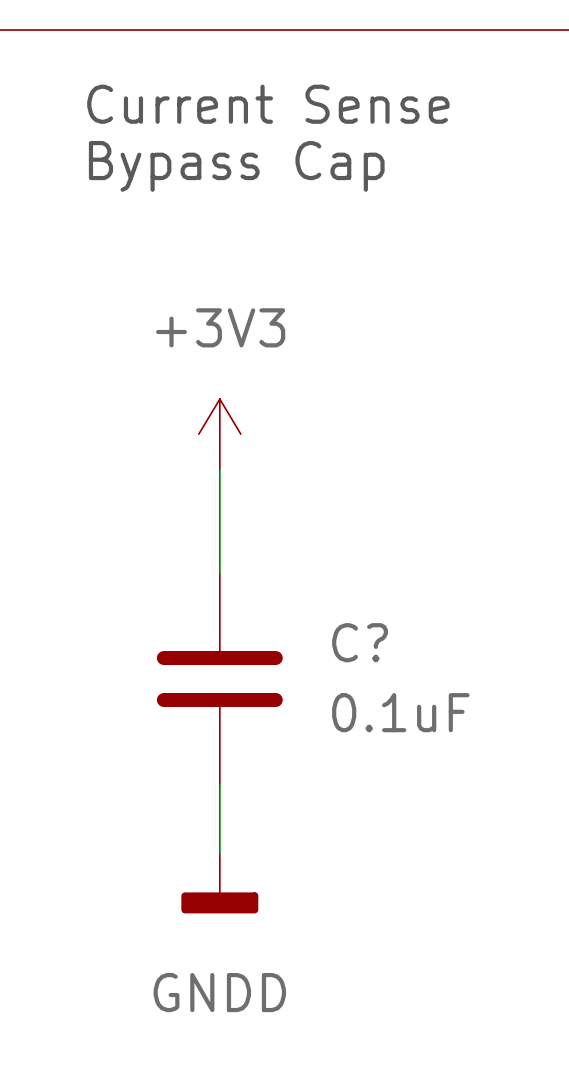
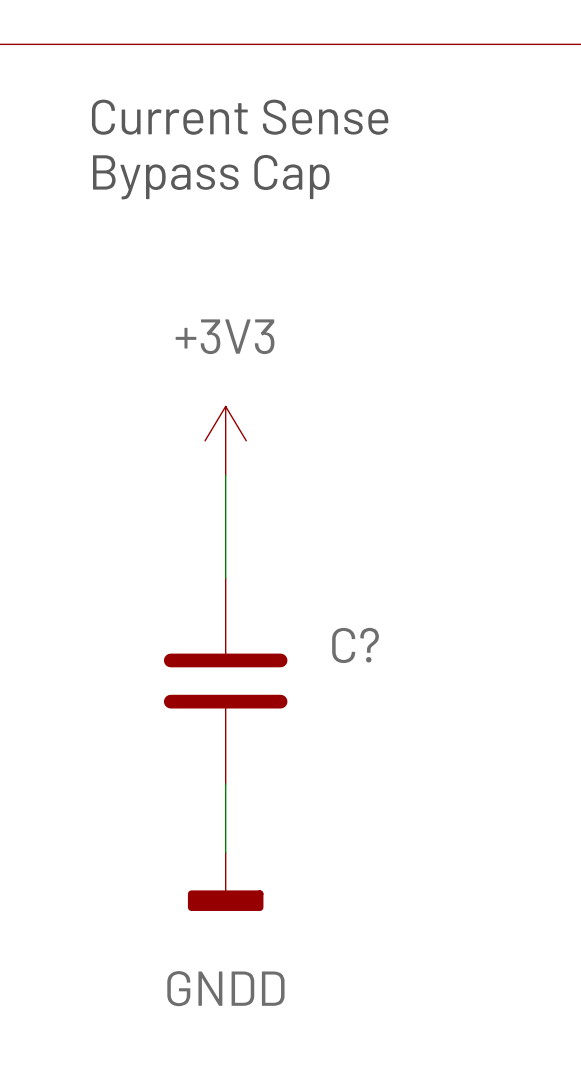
C? value: 0.1uF (400, 712) -> none

